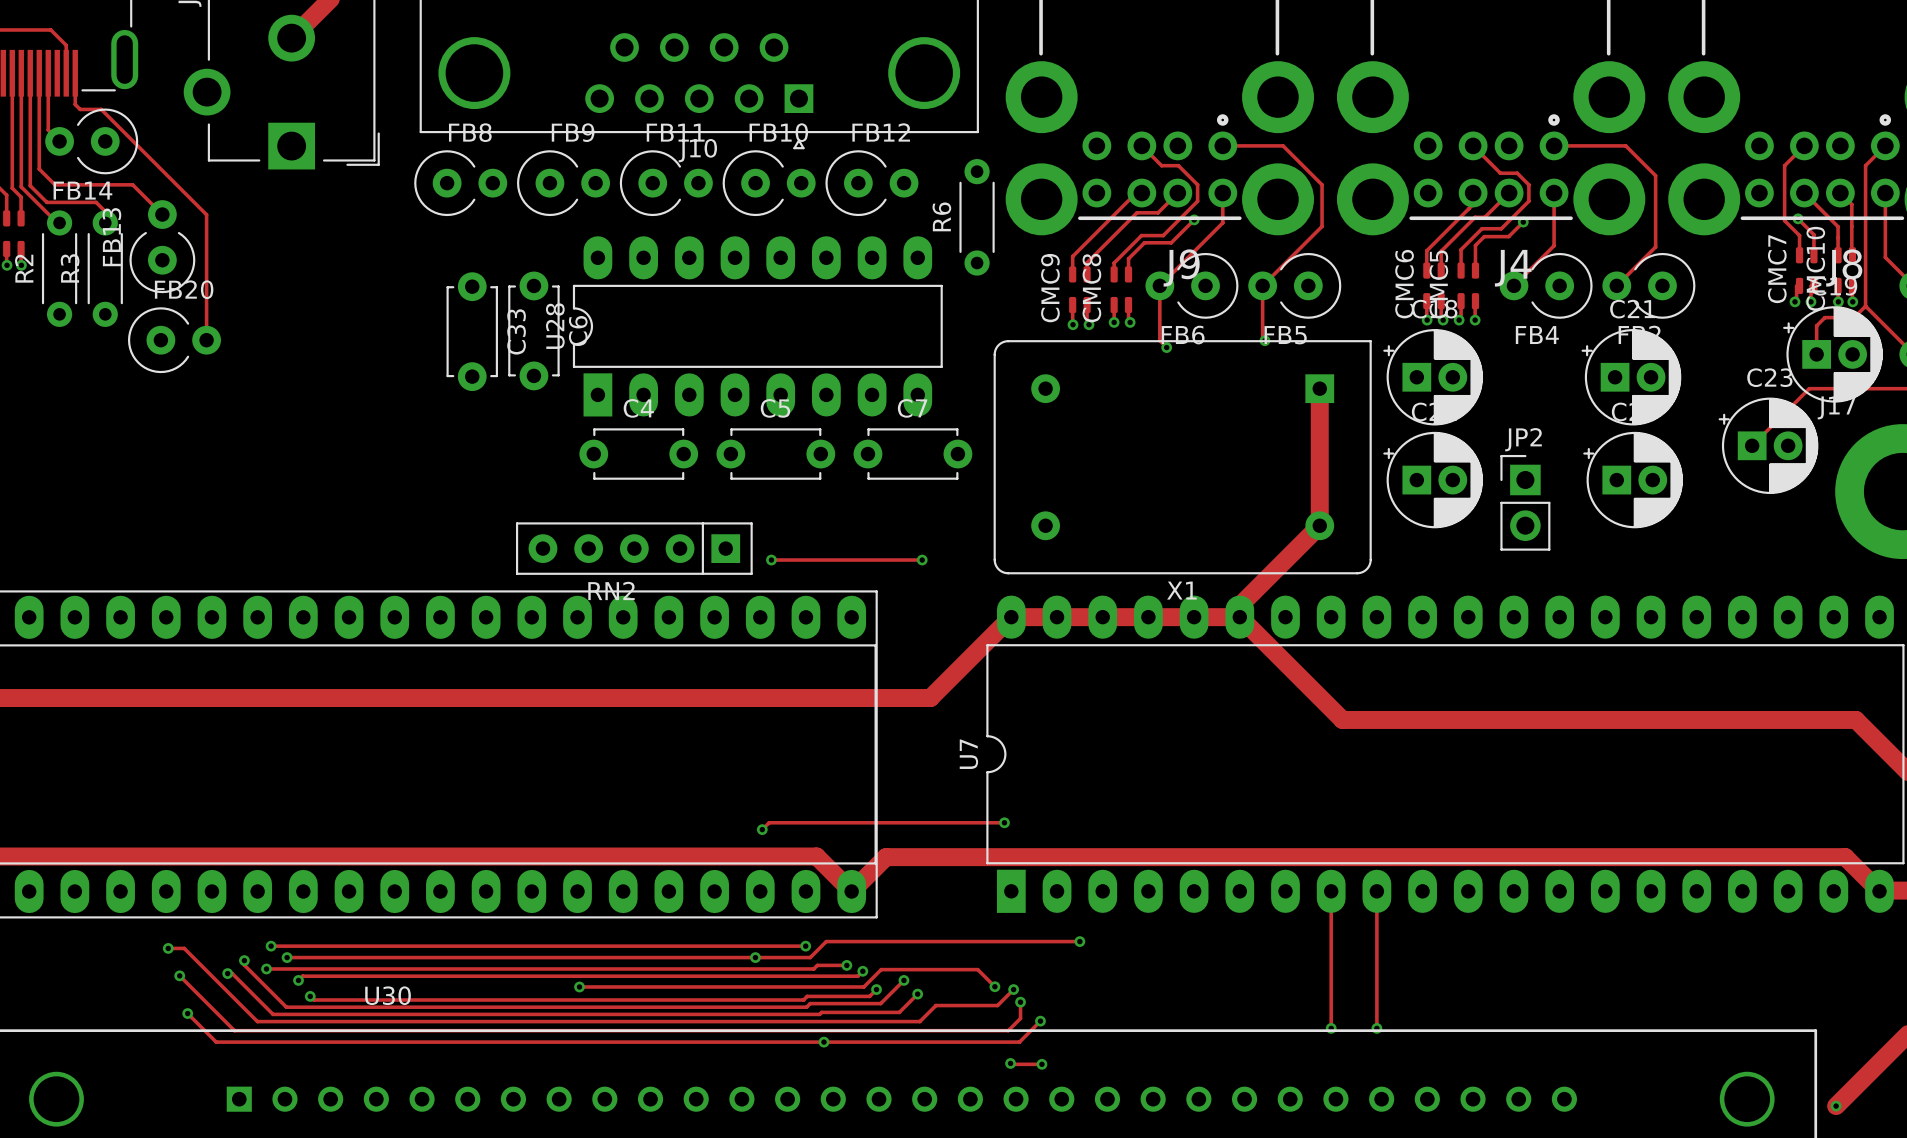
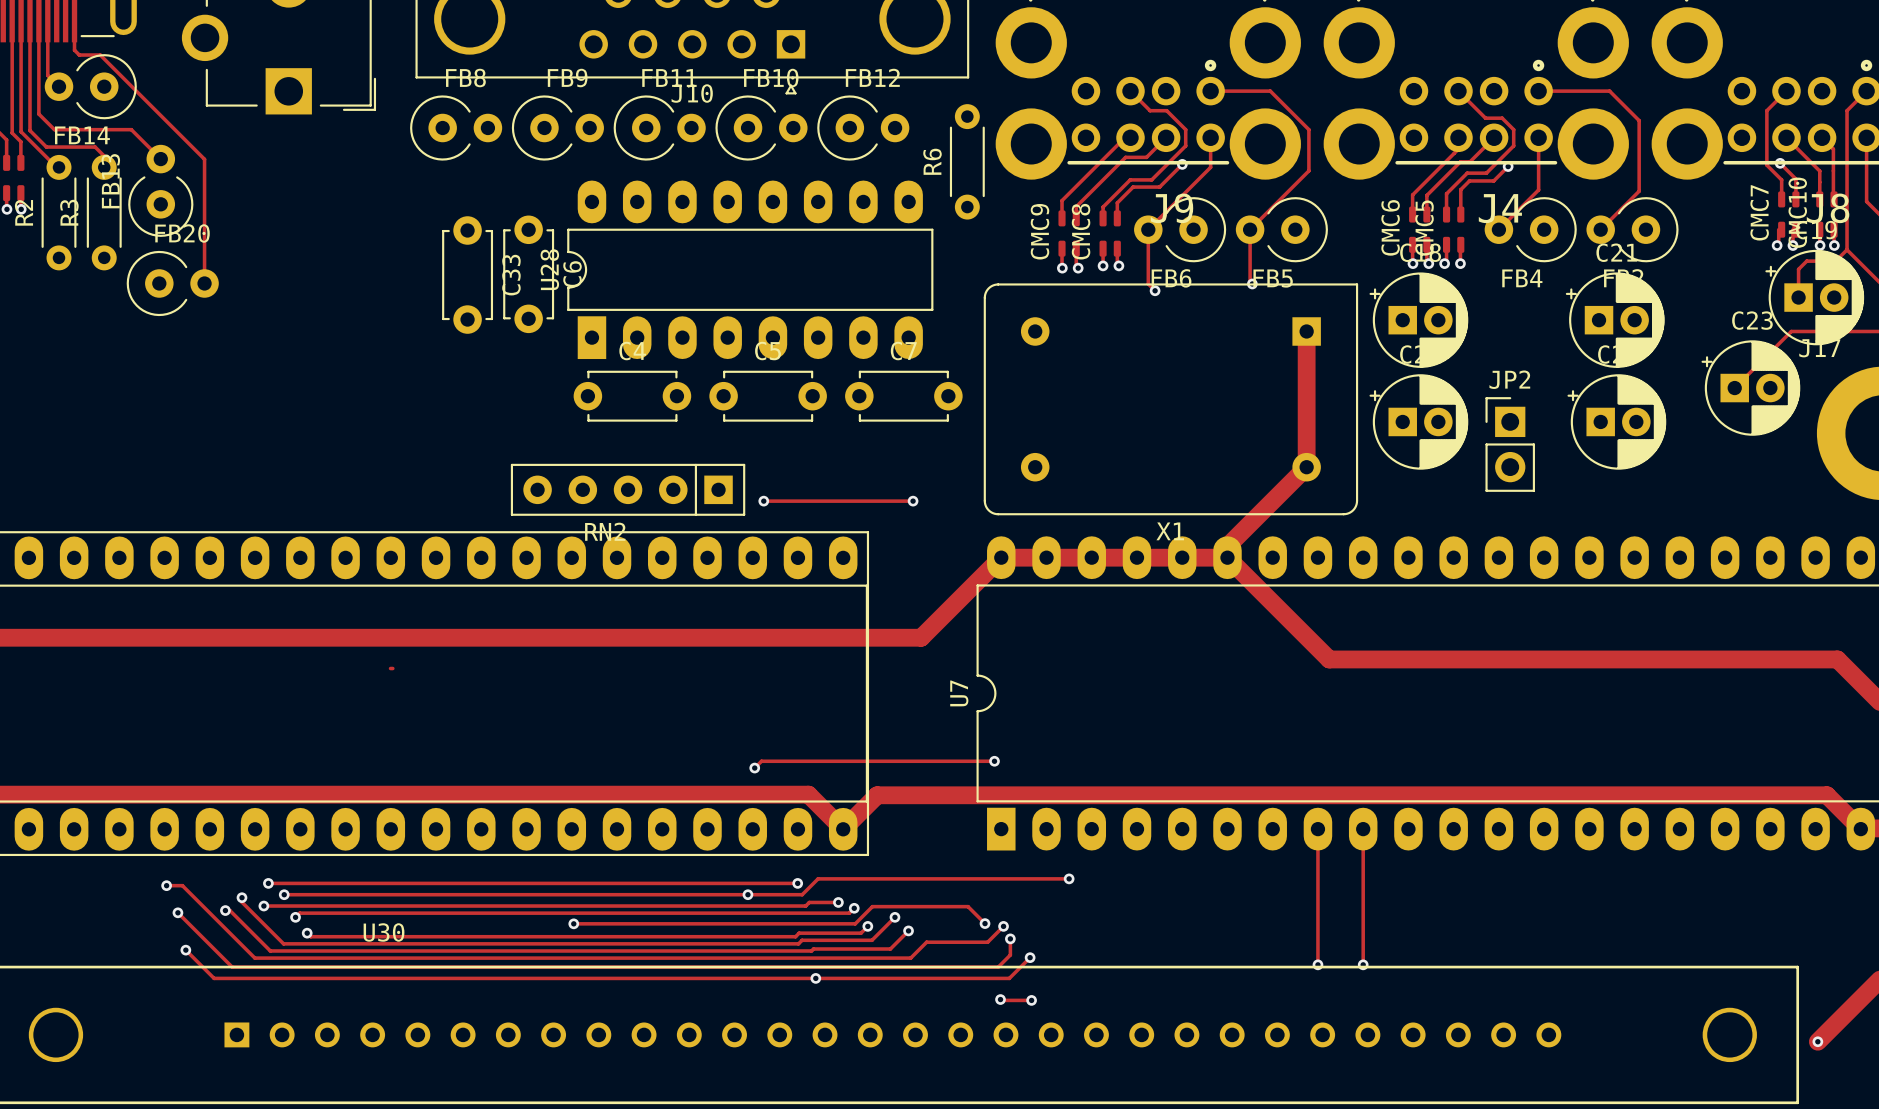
track: none -> (390, 668) (392, 668)

